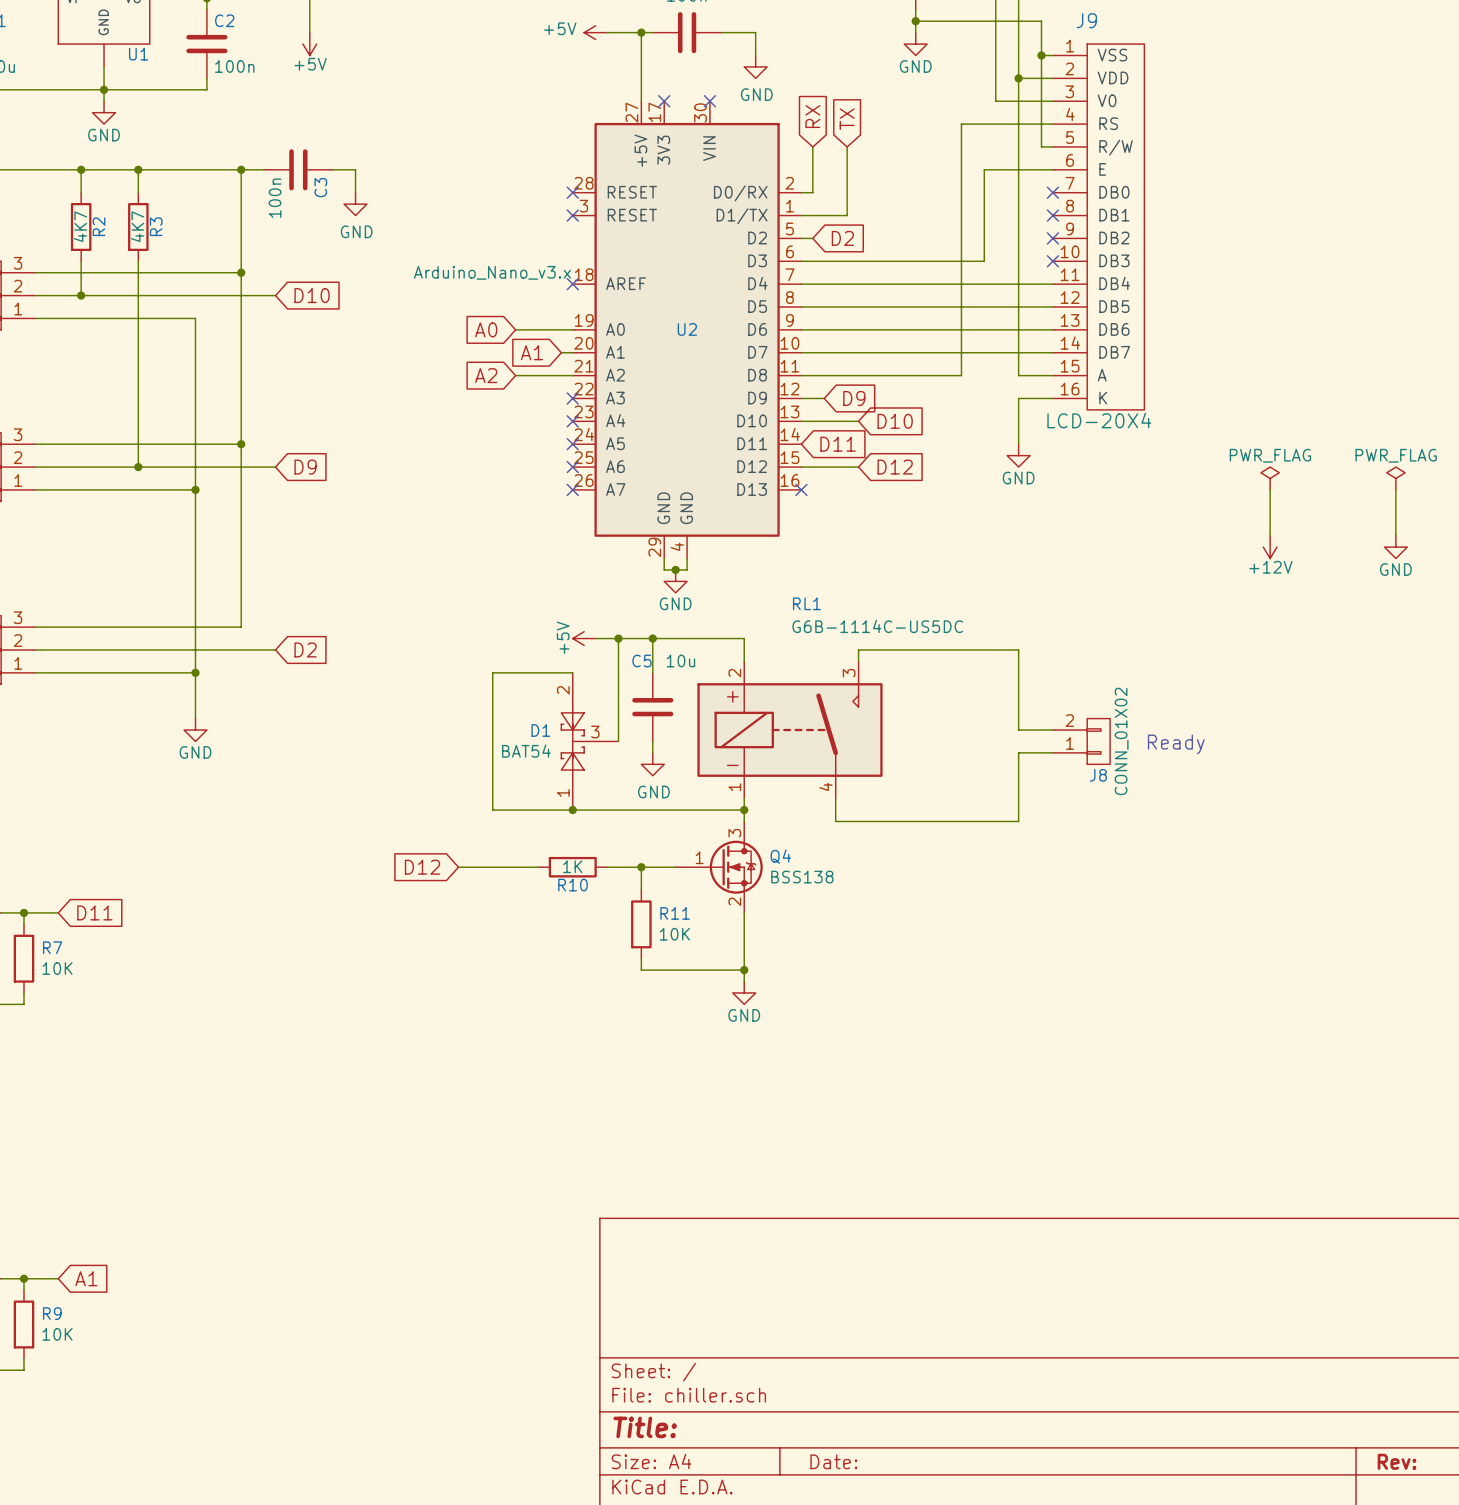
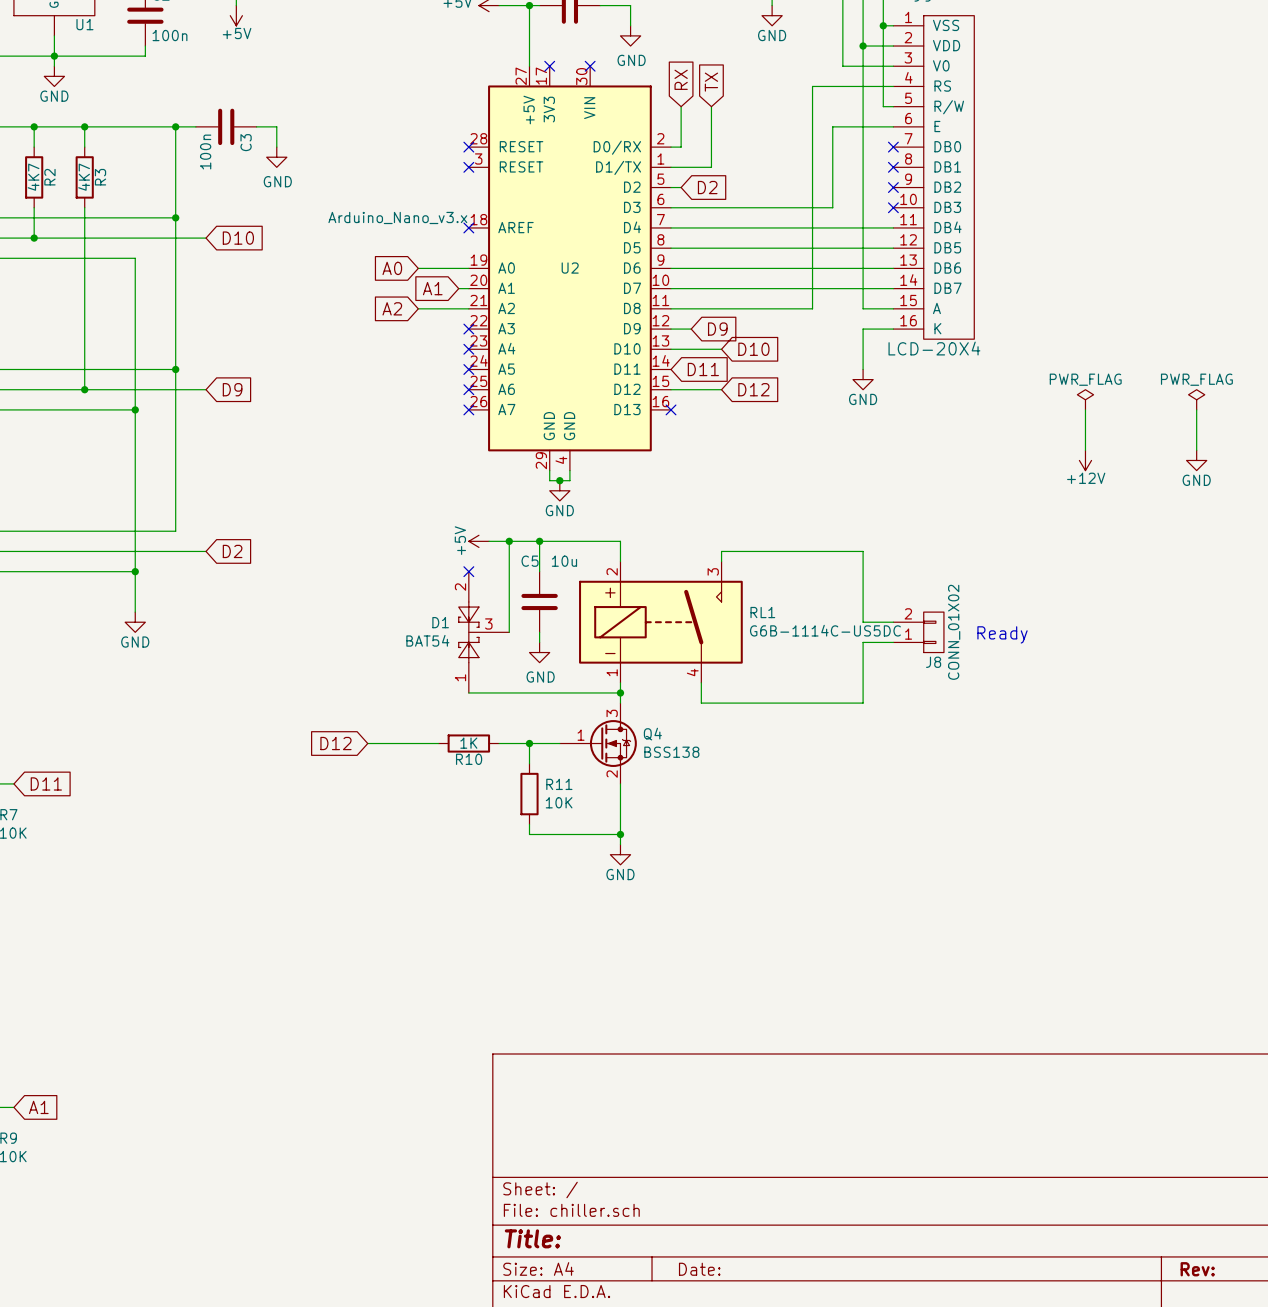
RL1 name position: RL1 (806, 603) -> RL1 (762, 612)
RL1 value position: G6B-1114C-US5DC (877, 626) -> G6B-1114C-US5DC (825, 630)
wire: (572, 672) (492, 672) (492, 810) (572, 810) -> none
no-connect mark: none -> (468, 571)
junction: (572, 810) -> none

